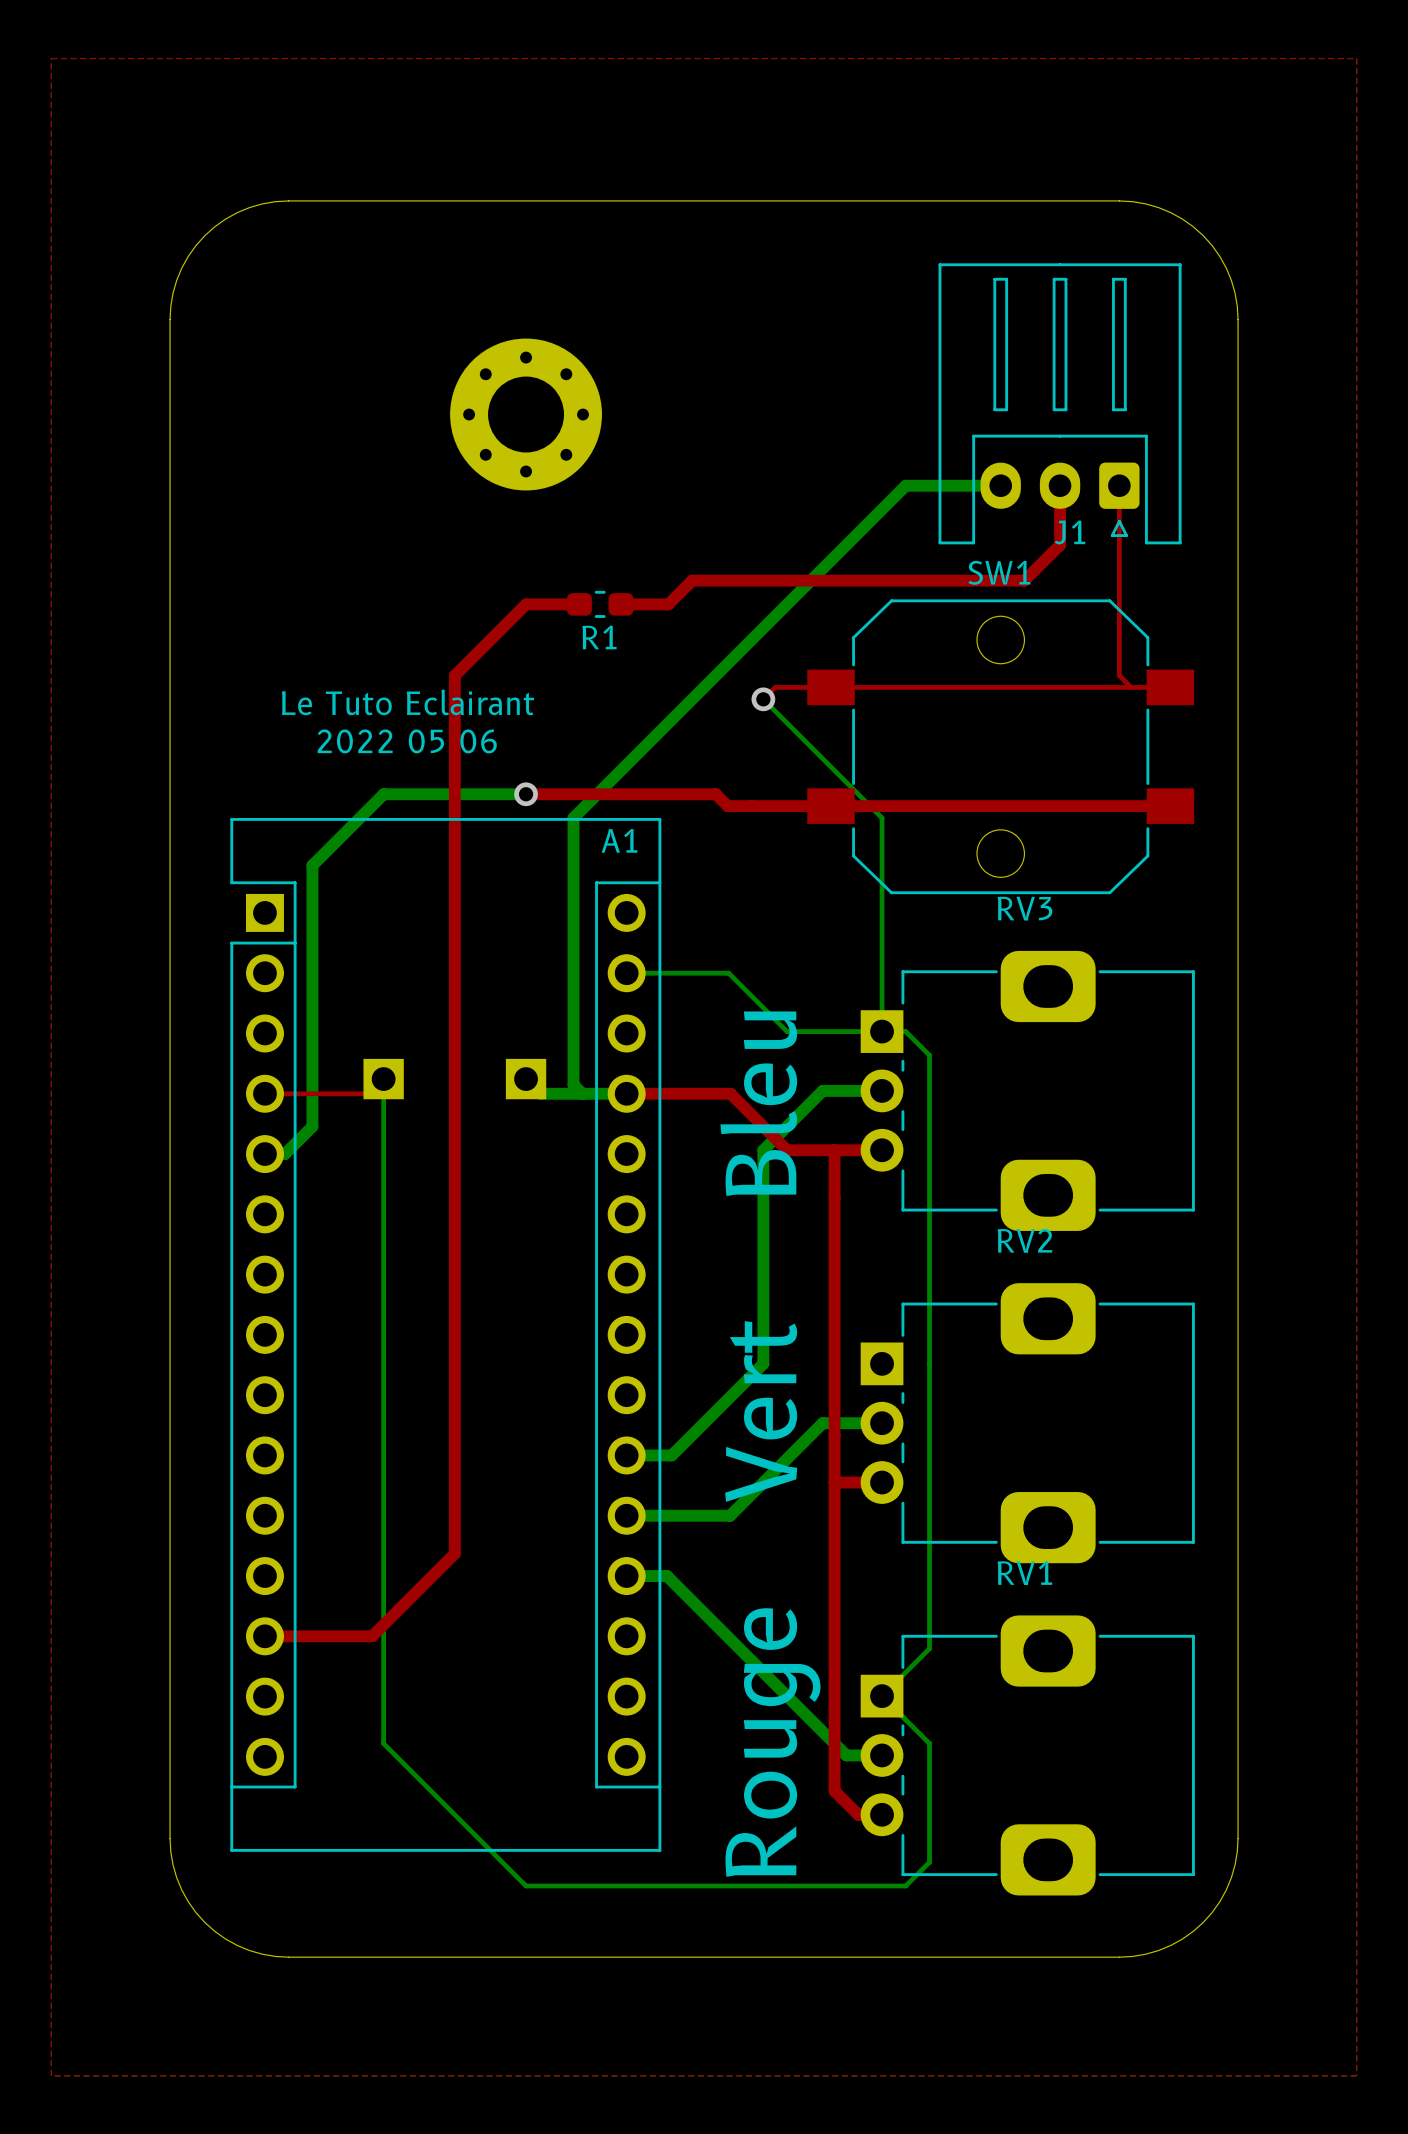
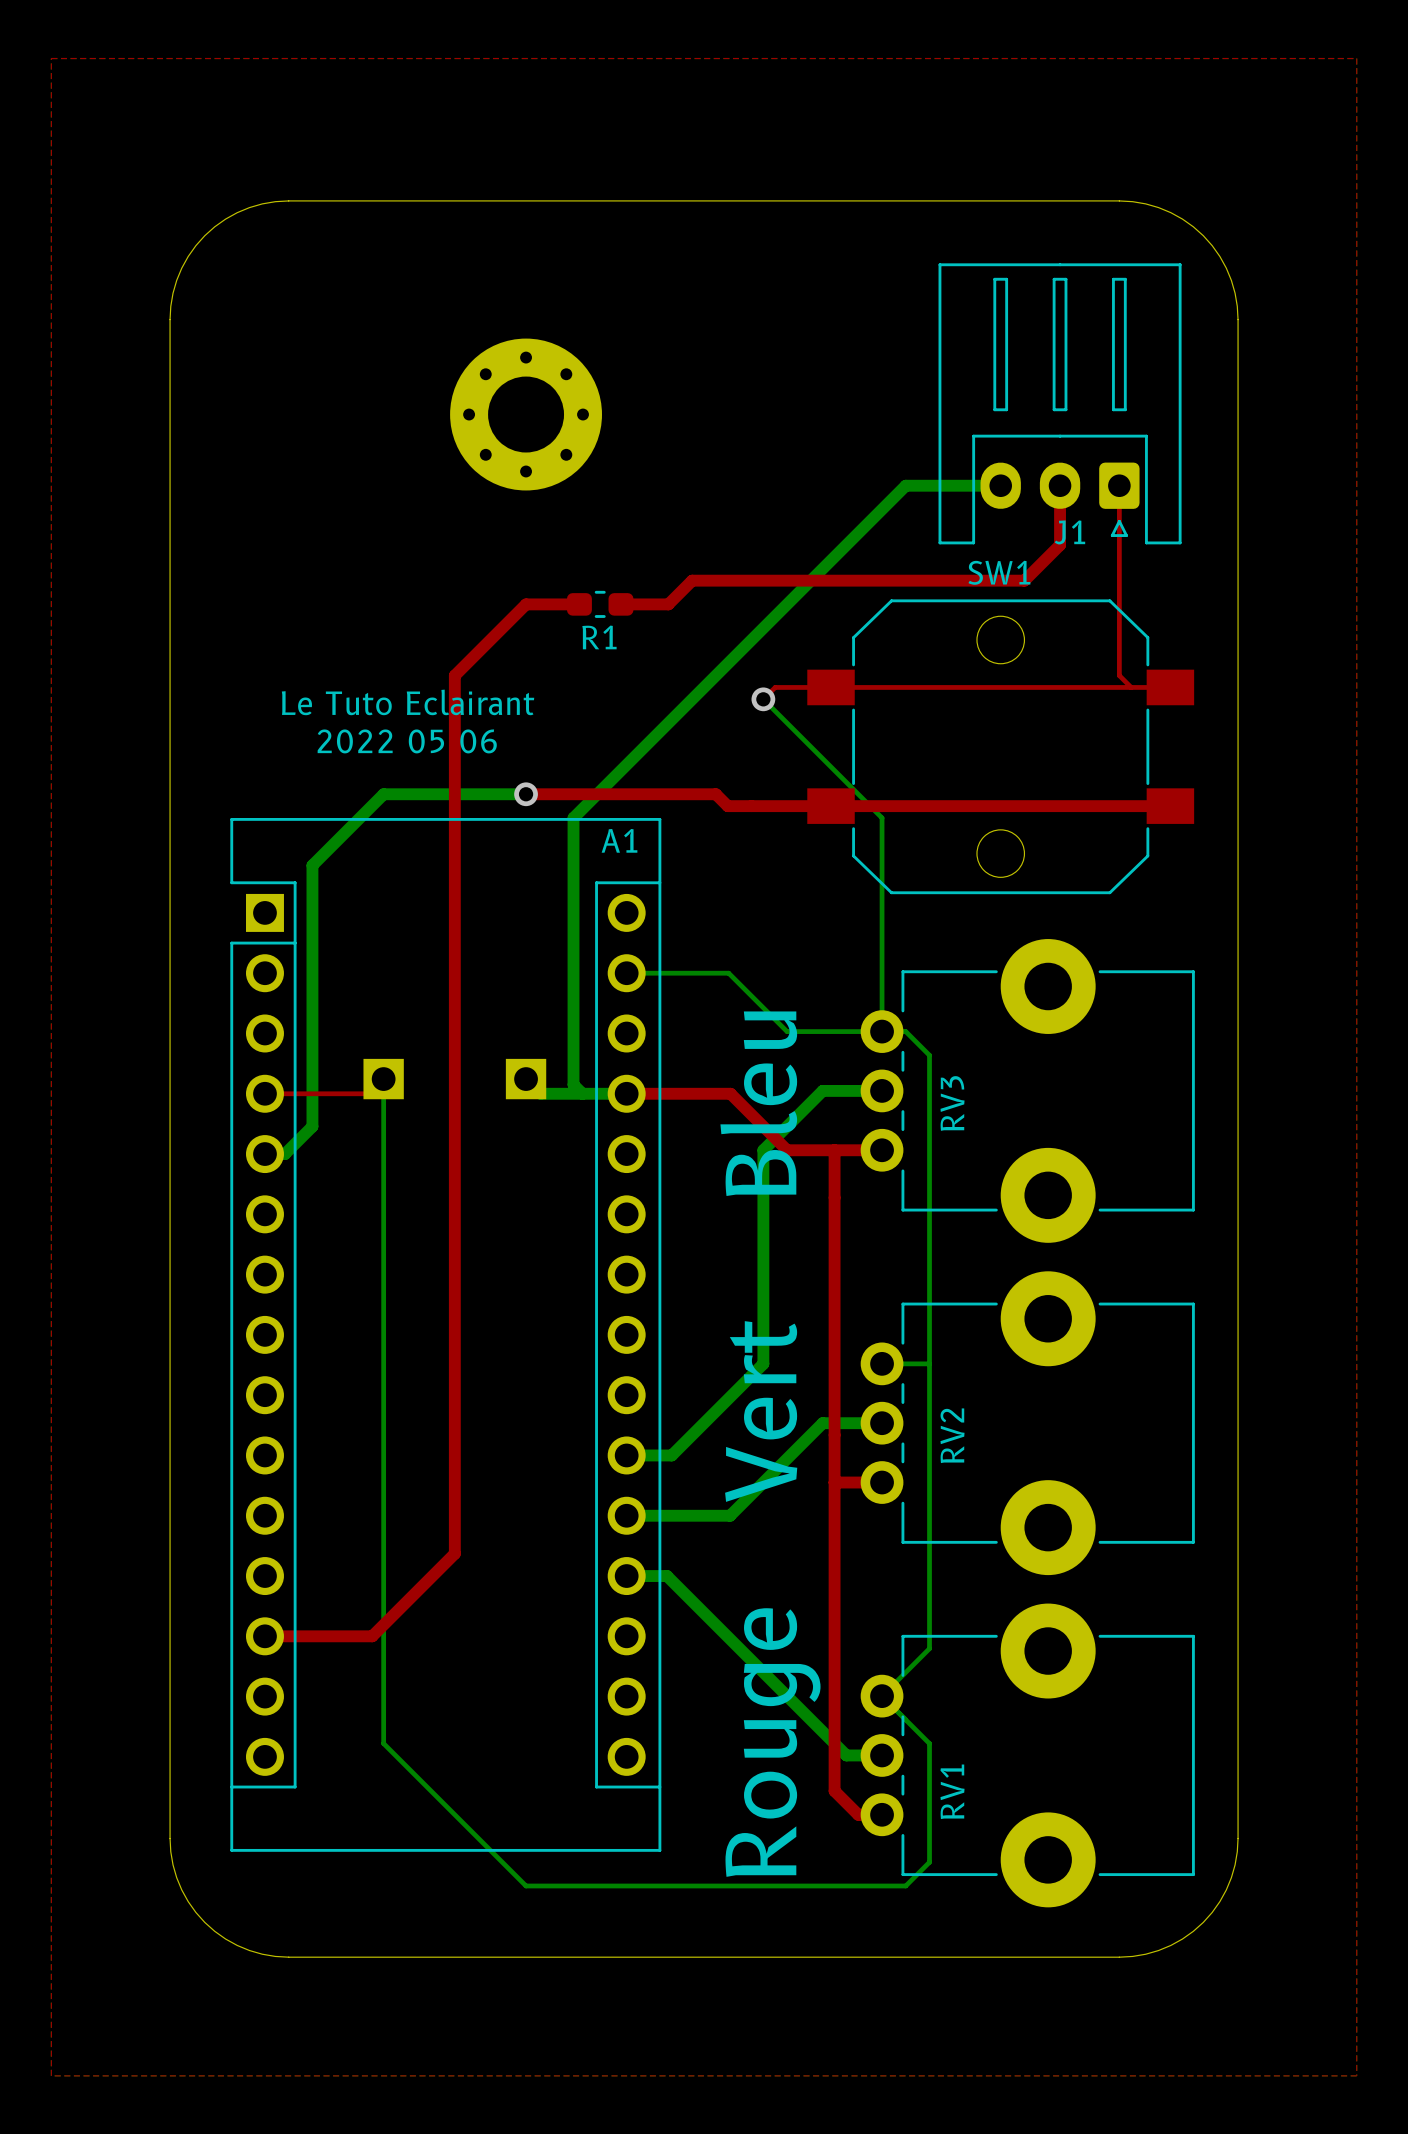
RV3 name position: RV3 (1024, 908) -> RV3 (952, 1103)
RV3 footprint: [860, 950, 1195, 1231] -> [860, 939, 1195, 1243]
RV2 name position: RV2 (1024, 1240) -> RV2 (952, 1435)
RV2 footprint: [860, 1283, 1195, 1564] -> [860, 1271, 1195, 1576]
bottom track: none -> (882, 1363) (929, 1363)
RV1 name position: RV1 (1024, 1573) -> RV1 (952, 1791)
RV1 footprint: [860, 1615, 1195, 1896] -> [860, 1603, 1195, 1908]

